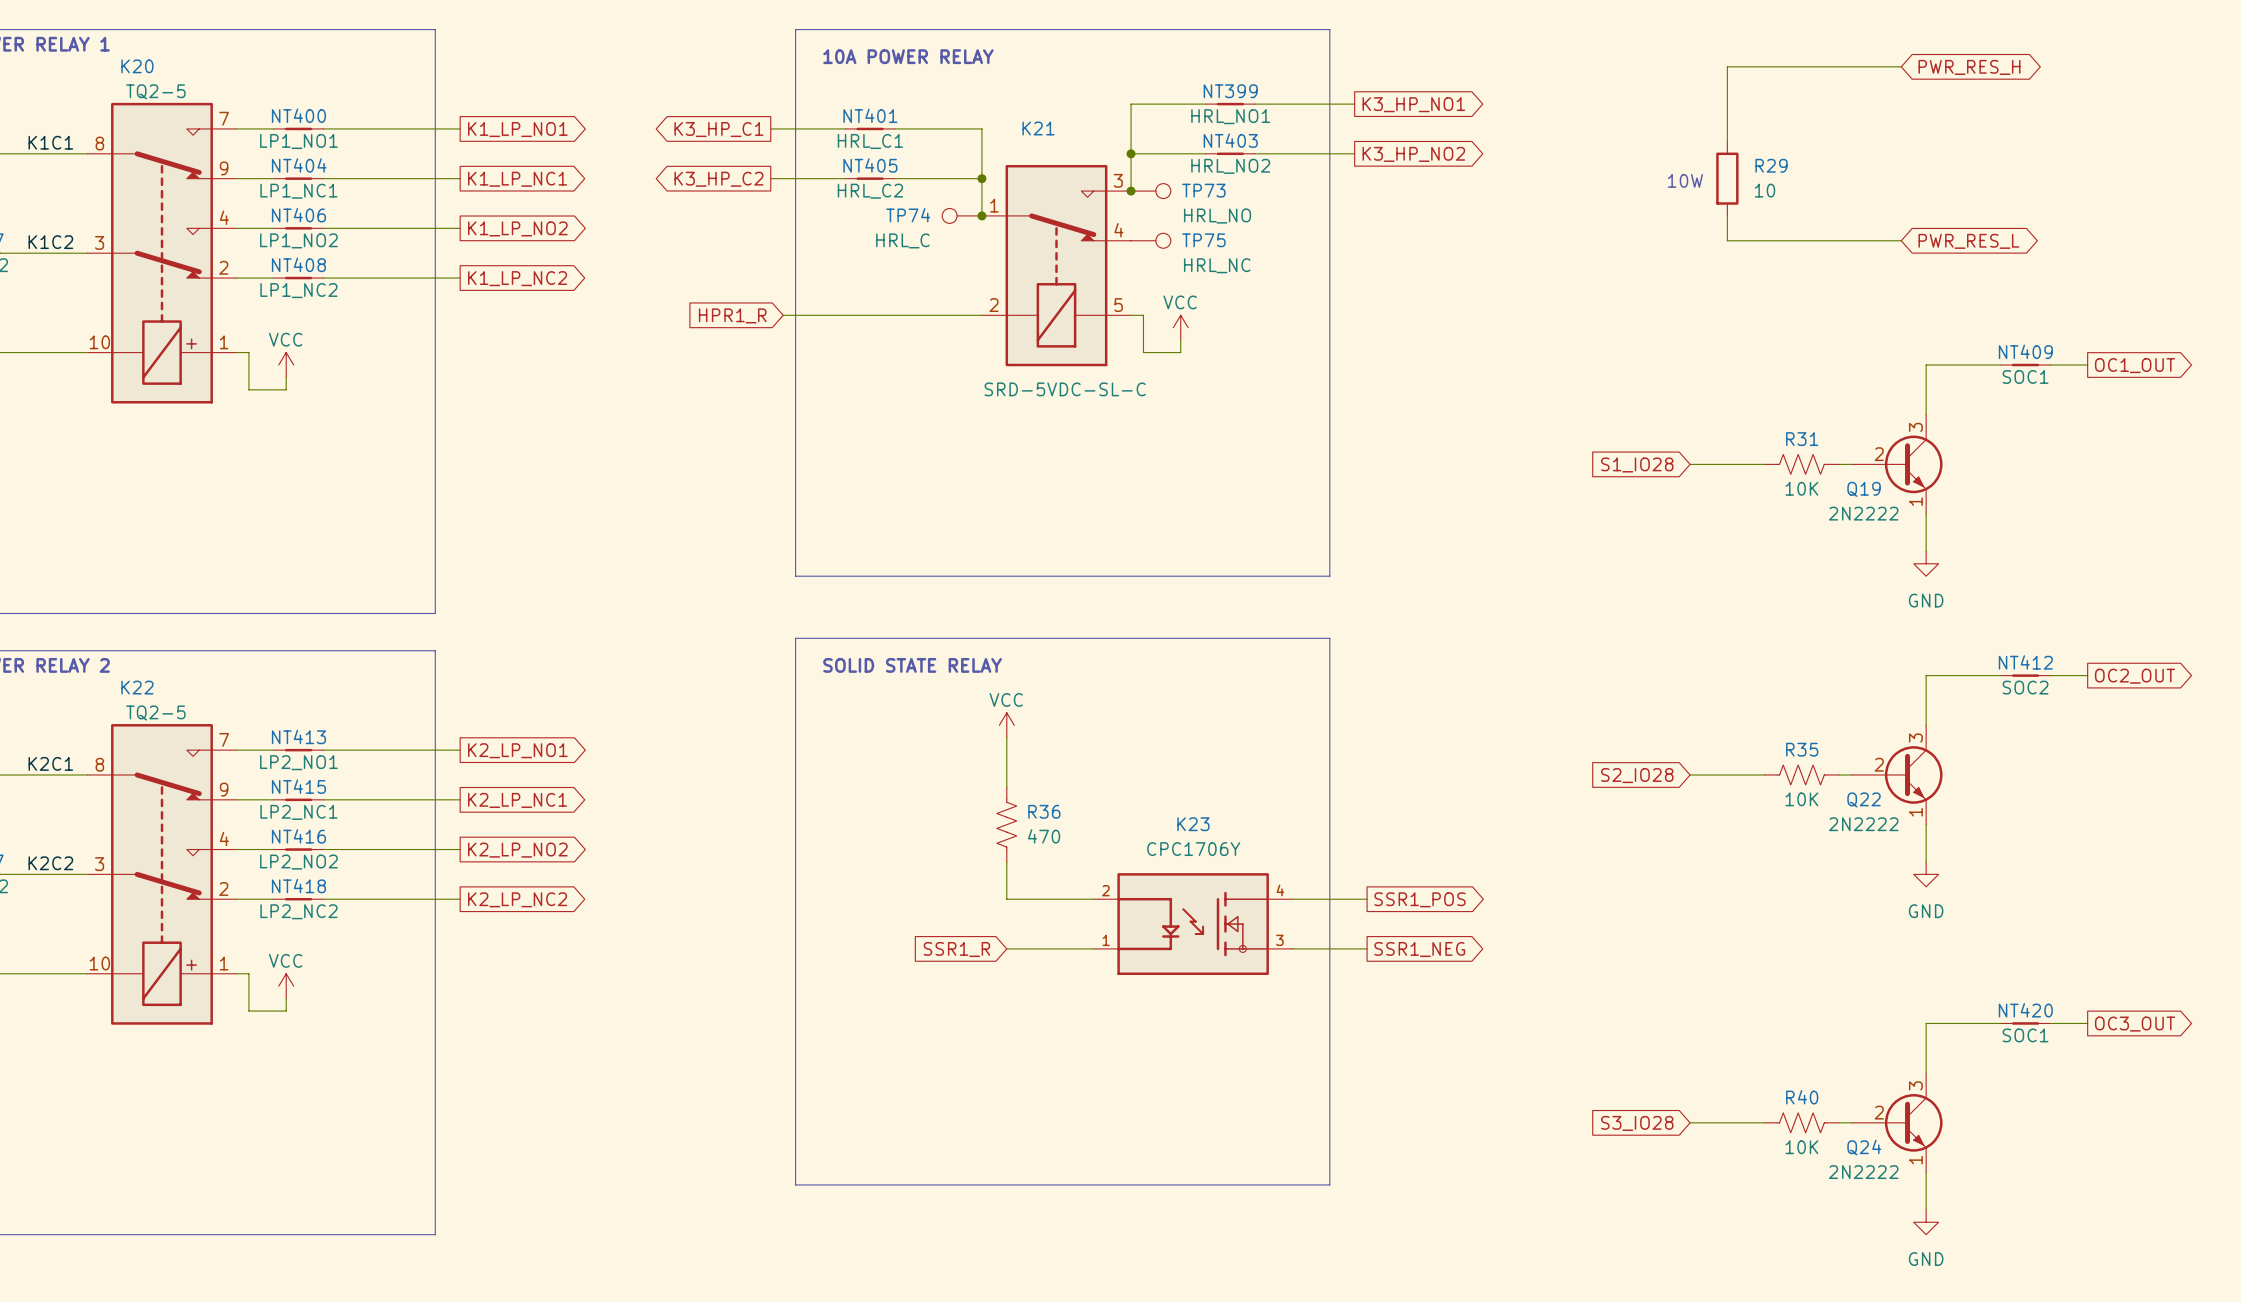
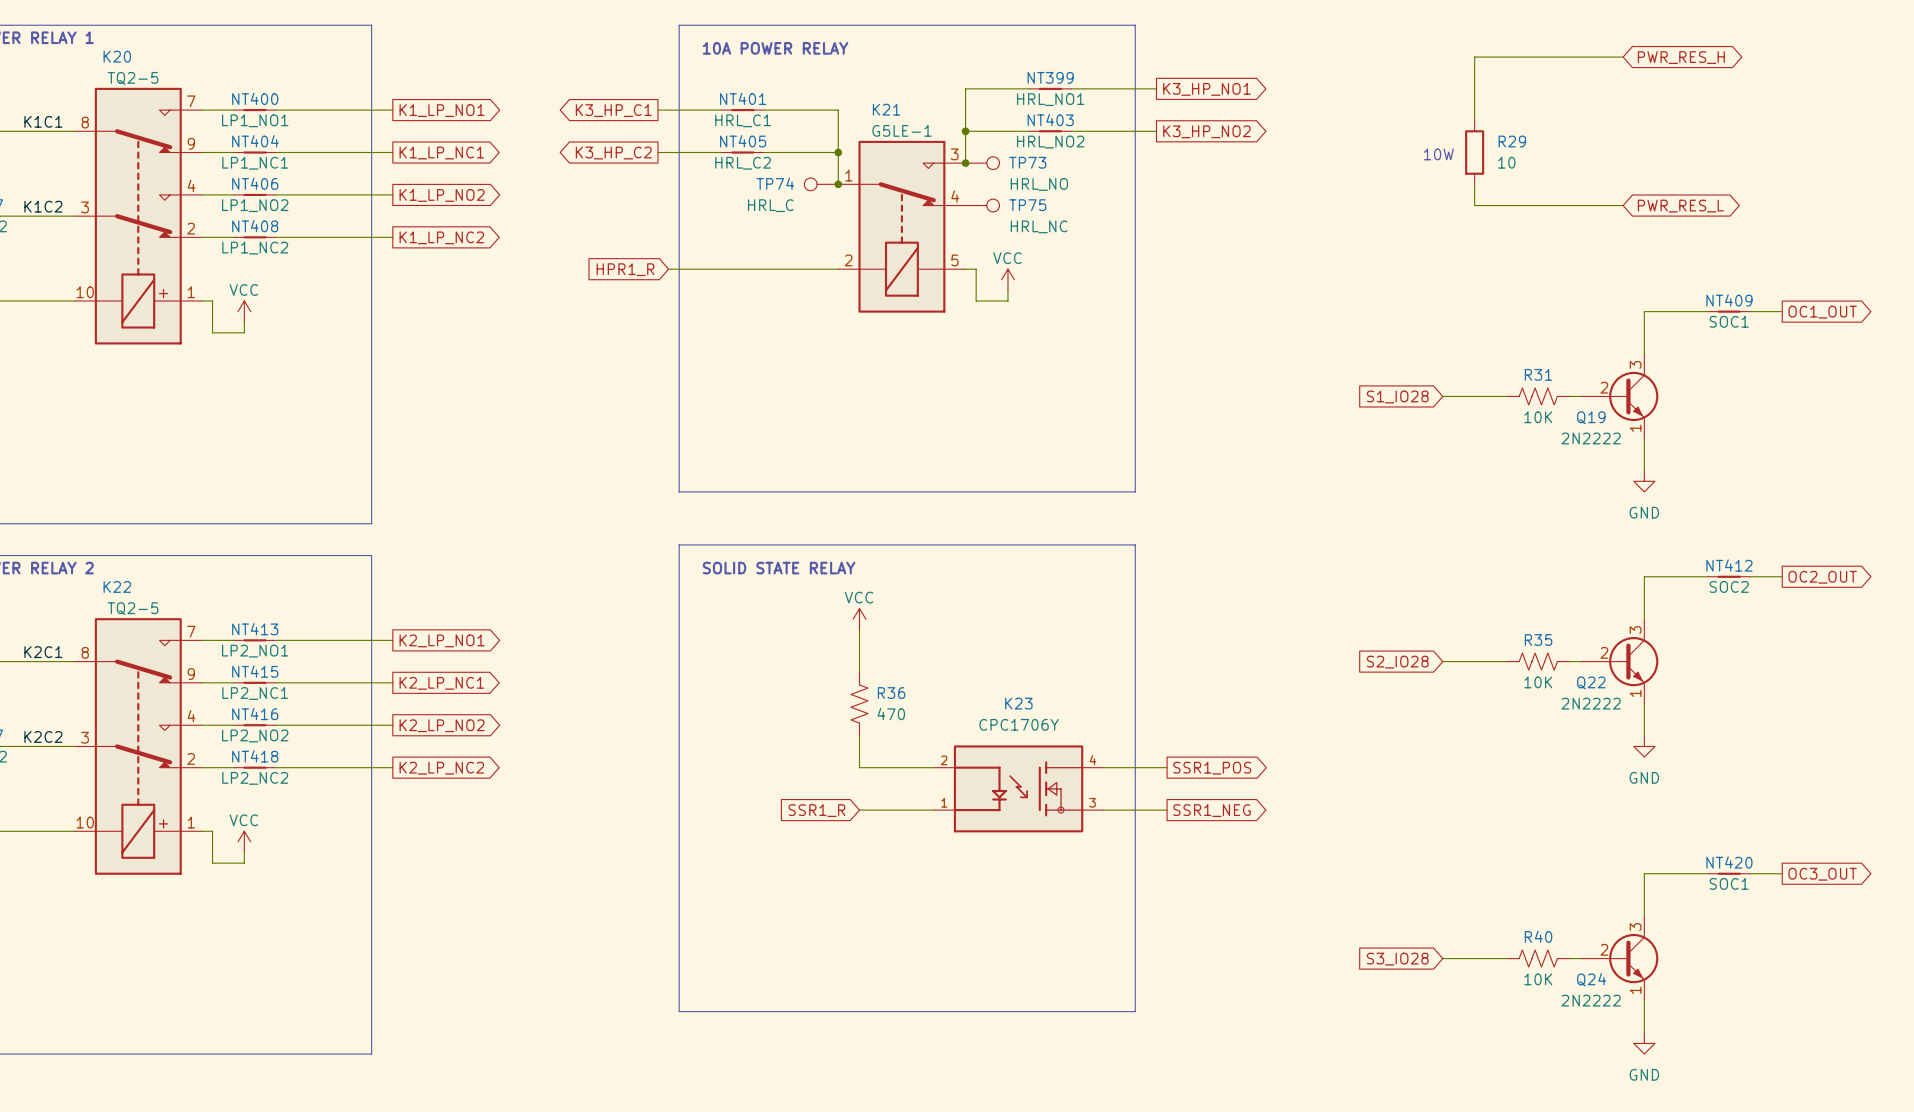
K21 value: SRD-5VDC-SL-C (1065, 389) -> G5LE-1 (902, 130)

